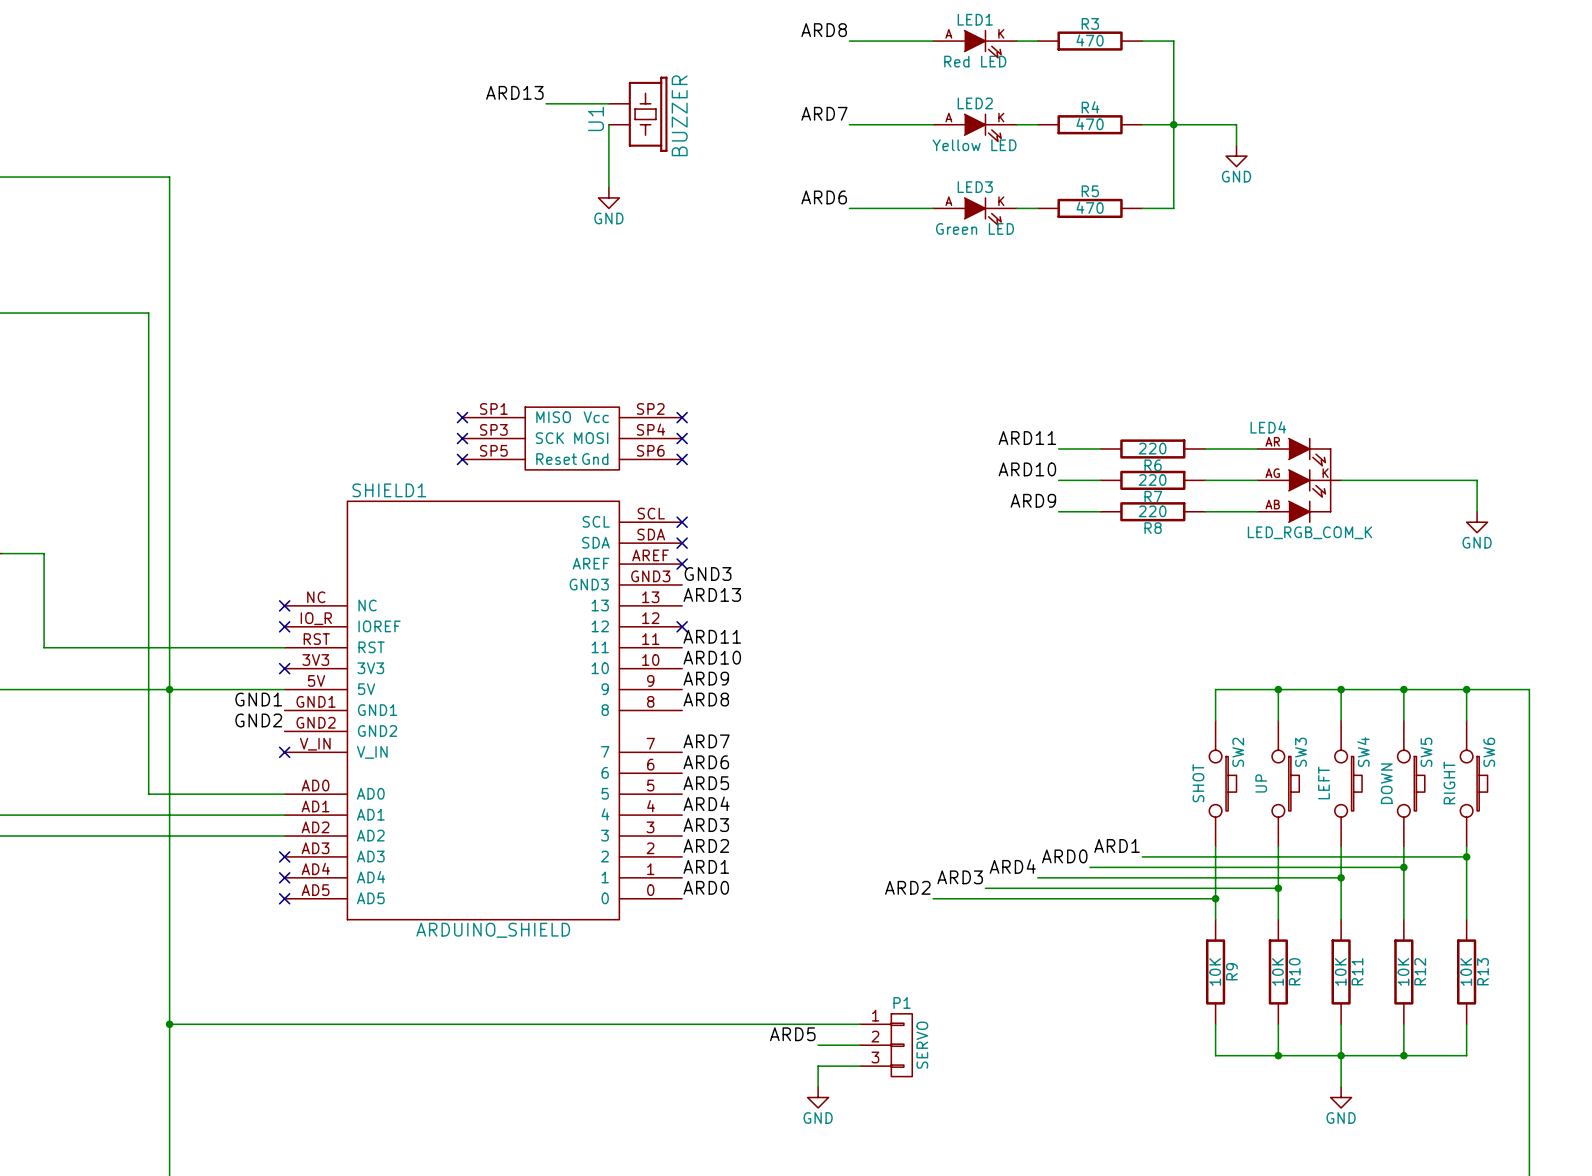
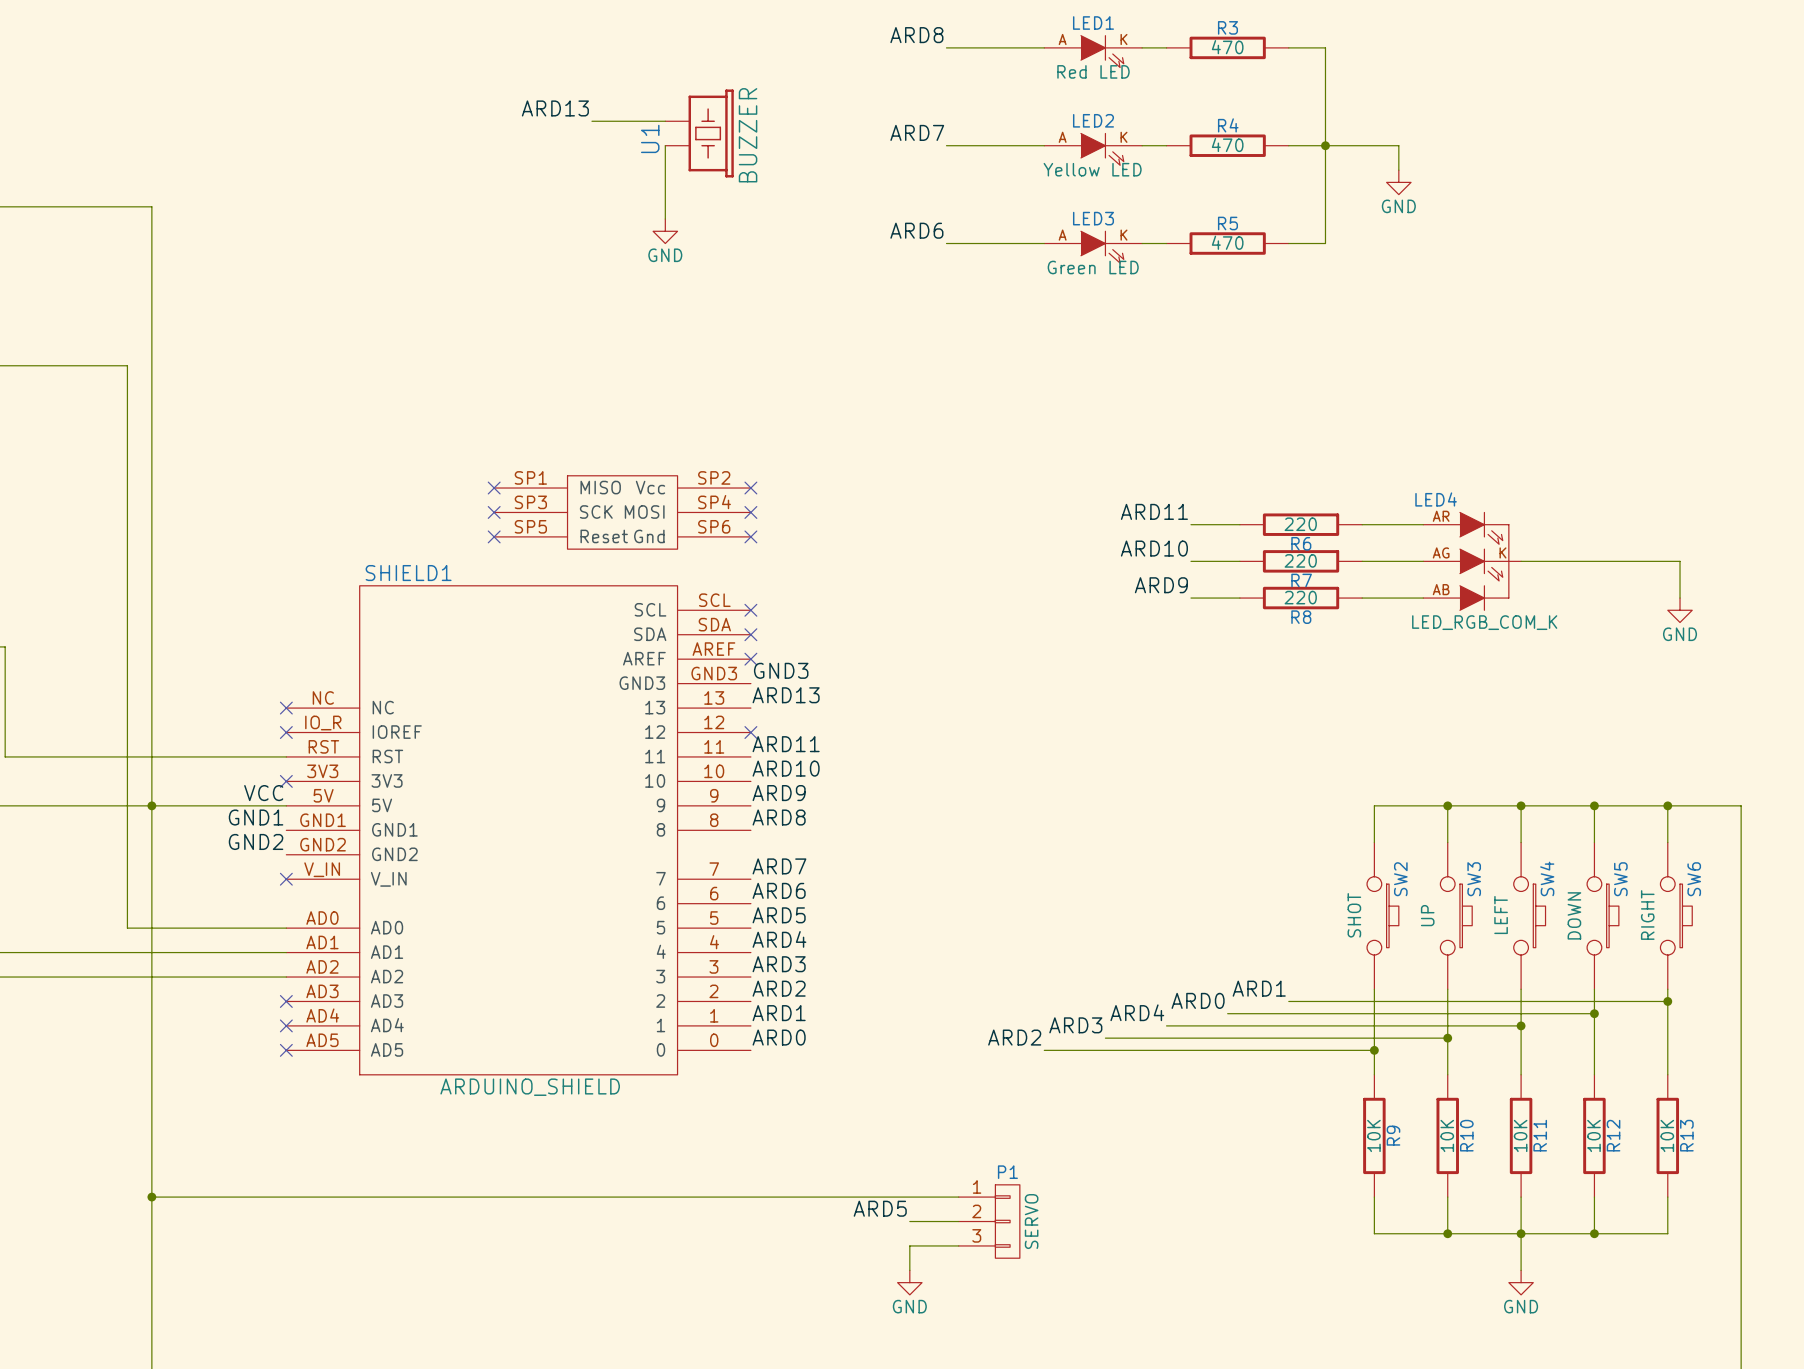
label: none -> VCC (263, 793)

